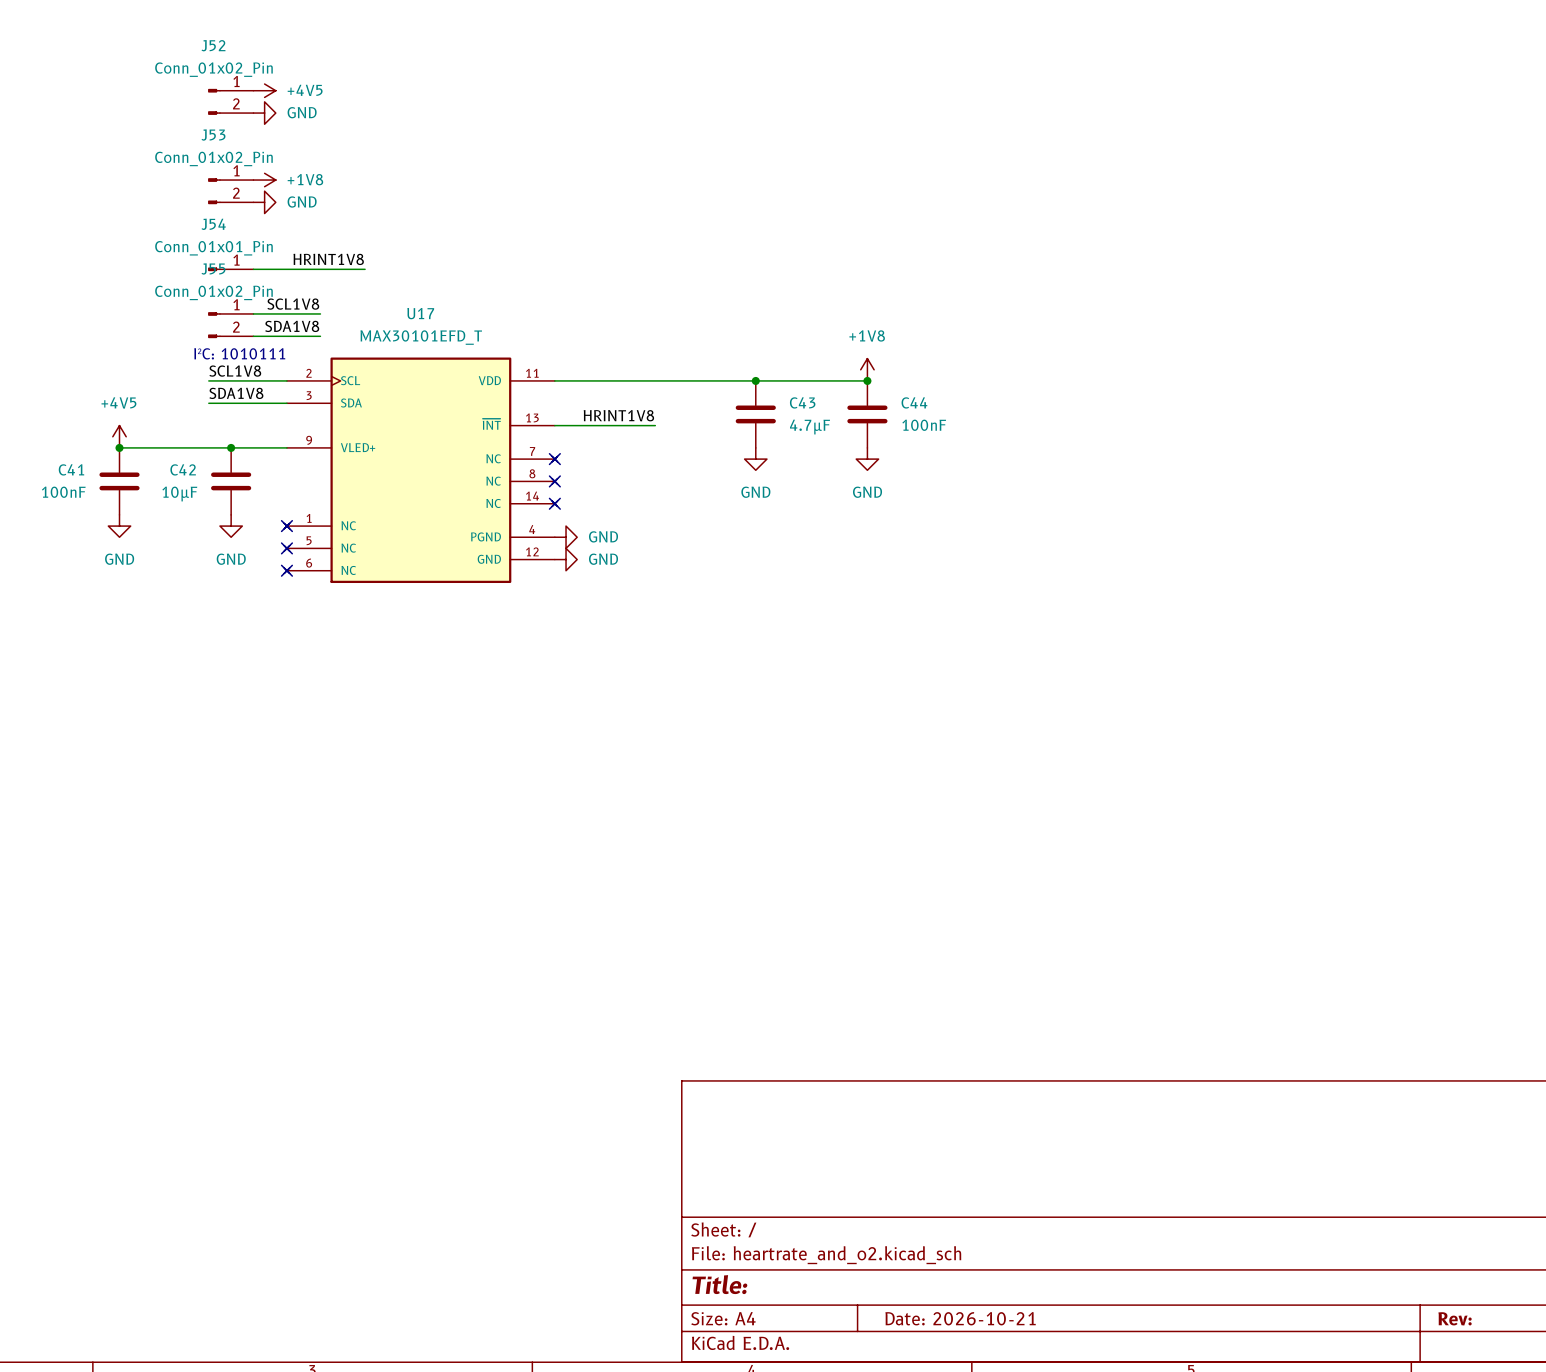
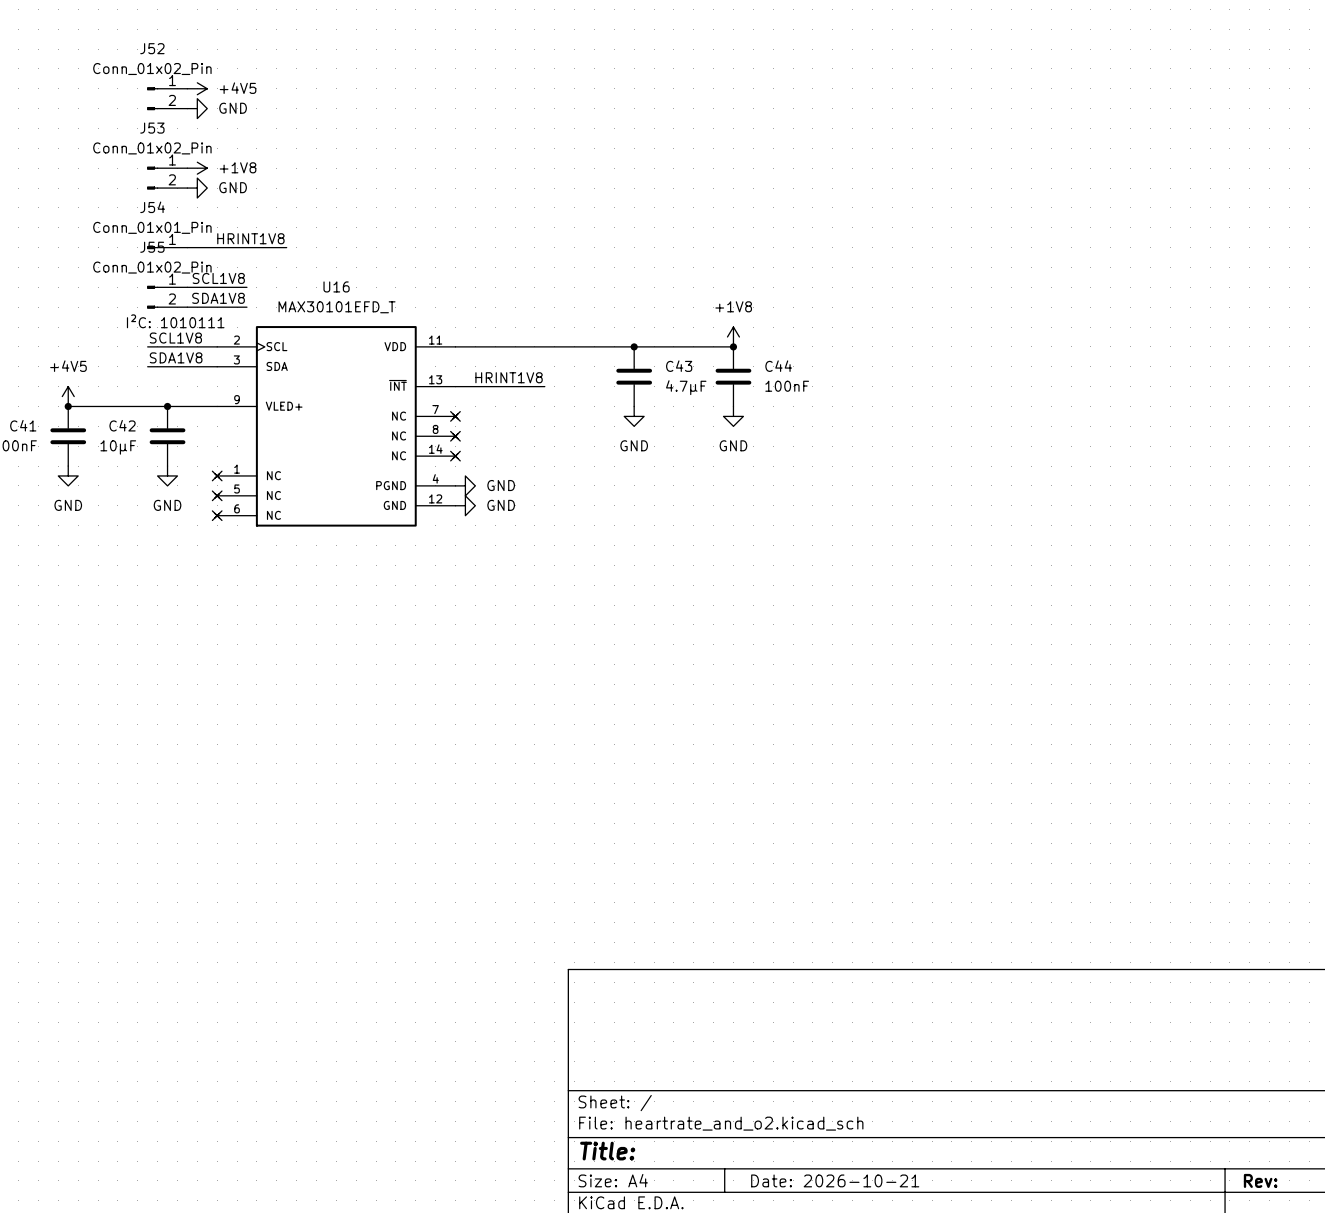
U17 name: U17 (420, 313) -> U16 (336, 286)

